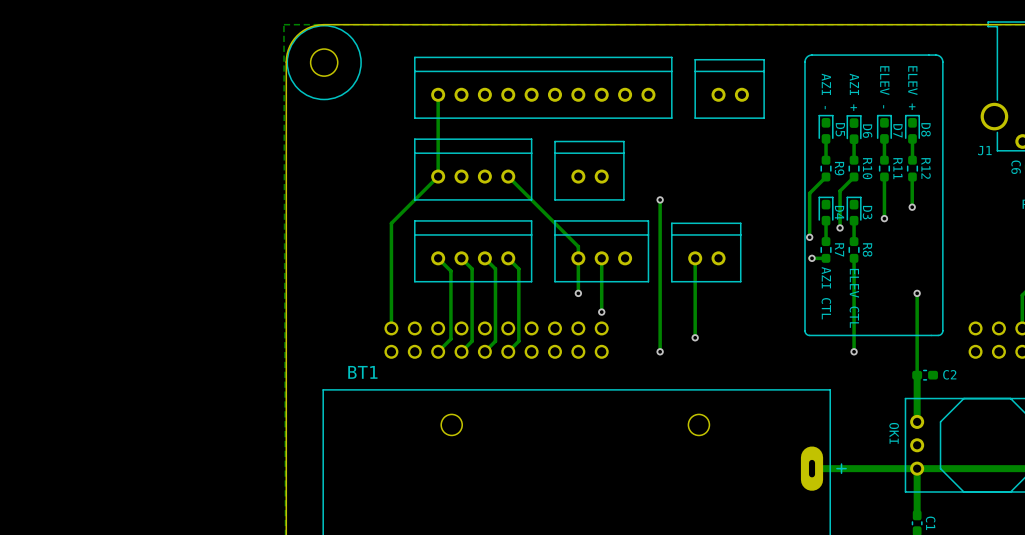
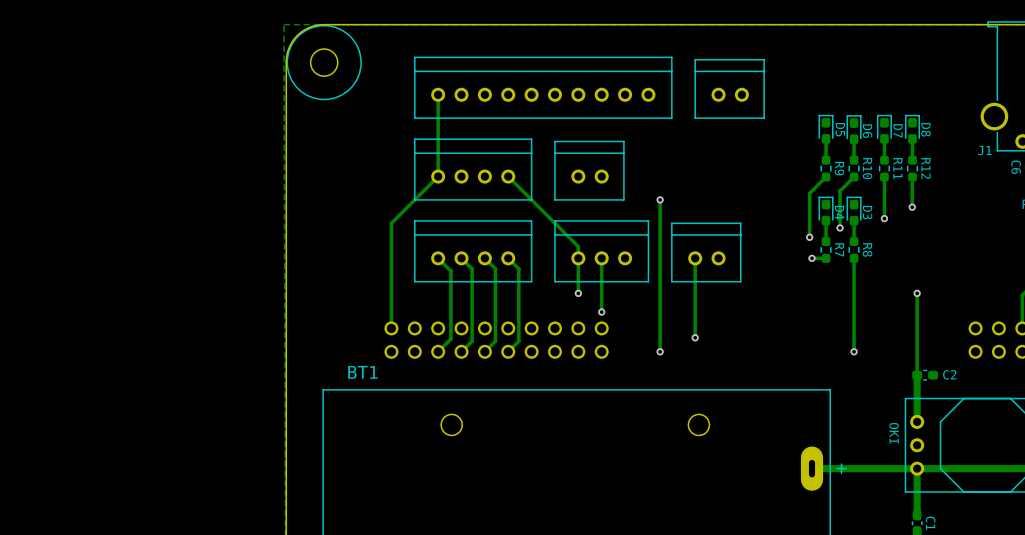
line: (935, 55) (812, 55) (805, 59) (805, 330) (807, 335) (938, 335) (942, 332) (942, 62) (940, 57) (935, 55) -> none
text: ELEV - (884, 87) -> none
text: ELEV + (912, 88) -> none
text: AZI - (826, 91) -> none
text: AZI + (854, 92) -> none
text: AZI CTL (826, 293) -> none
text: ELEV CTL (854, 298) -> none

